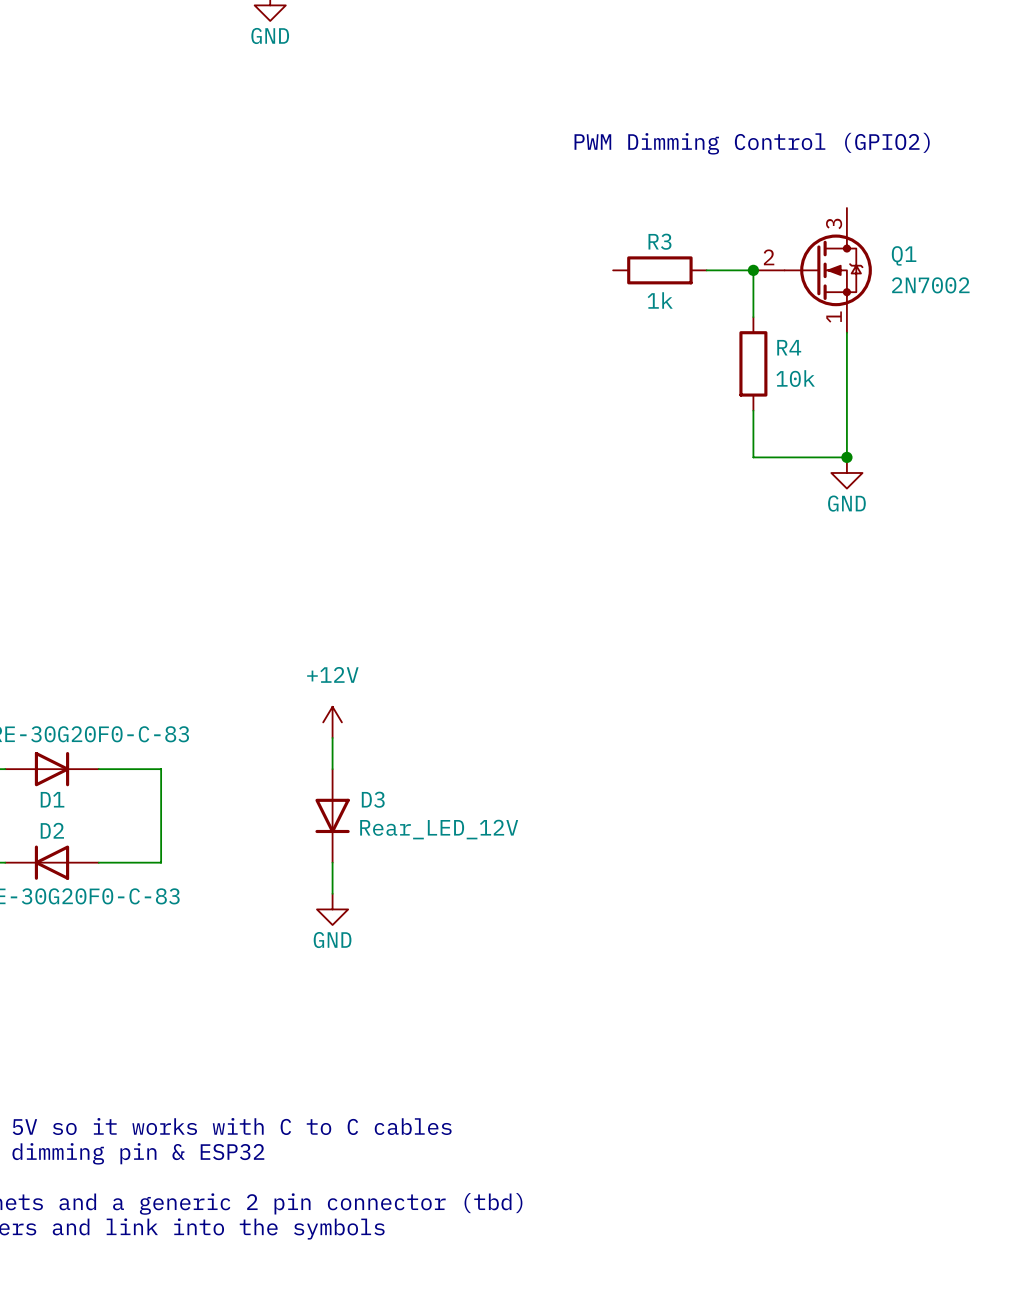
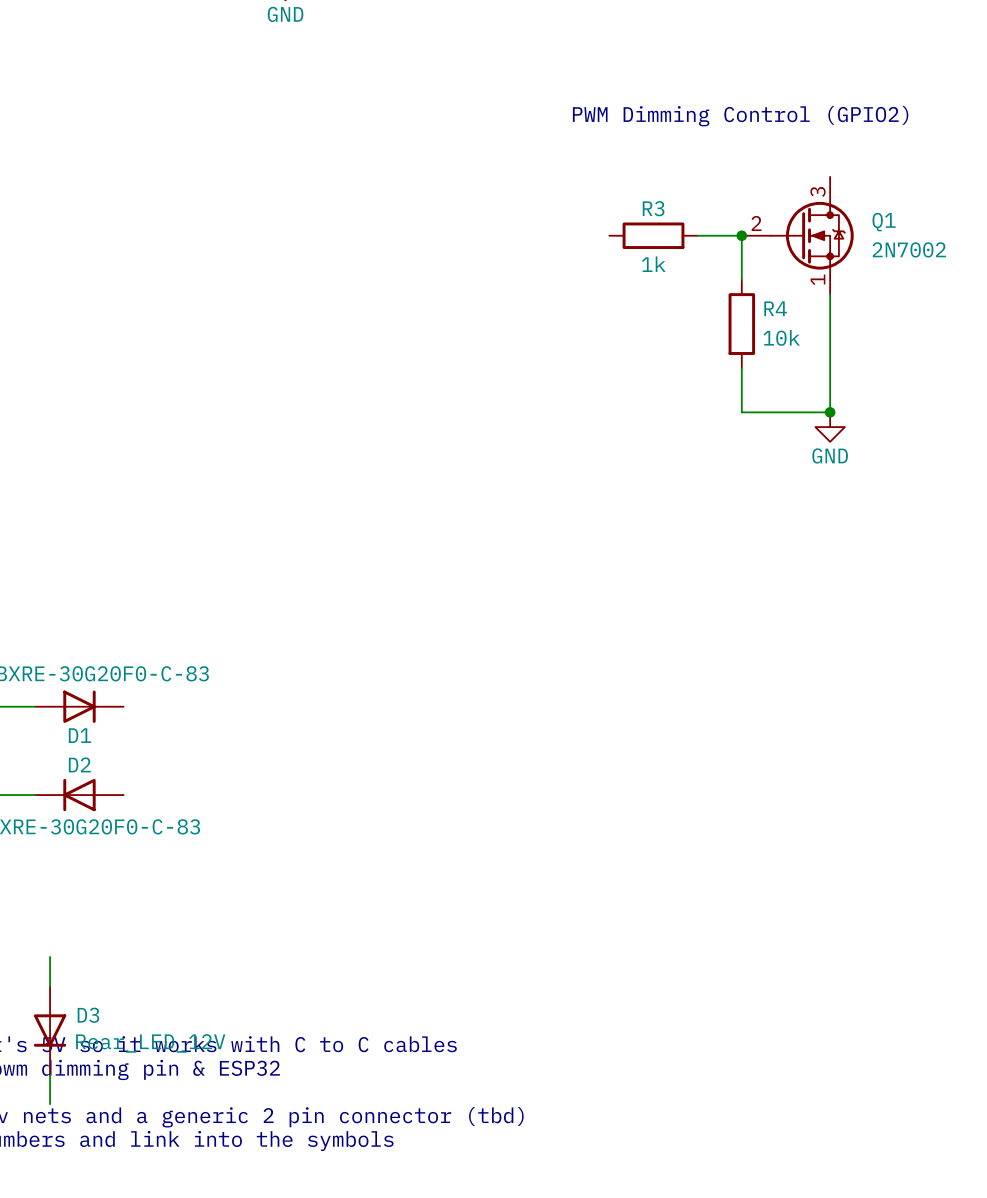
power symbol: +12V (332, 722) -> none
wire: (332, 737) (332, 769) -> none
wire: (98, 769) (161, 769) (161, 862) (98, 862) -> none
D3 position: (332, 815) -> (50, 1030)
wire: (332, 862) (332, 893) -> none
power symbol: GND (332, 909) -> none
wire: none -> (50, 956) (50, 986)
wire: none -> (50, 1074) (50, 1104)

